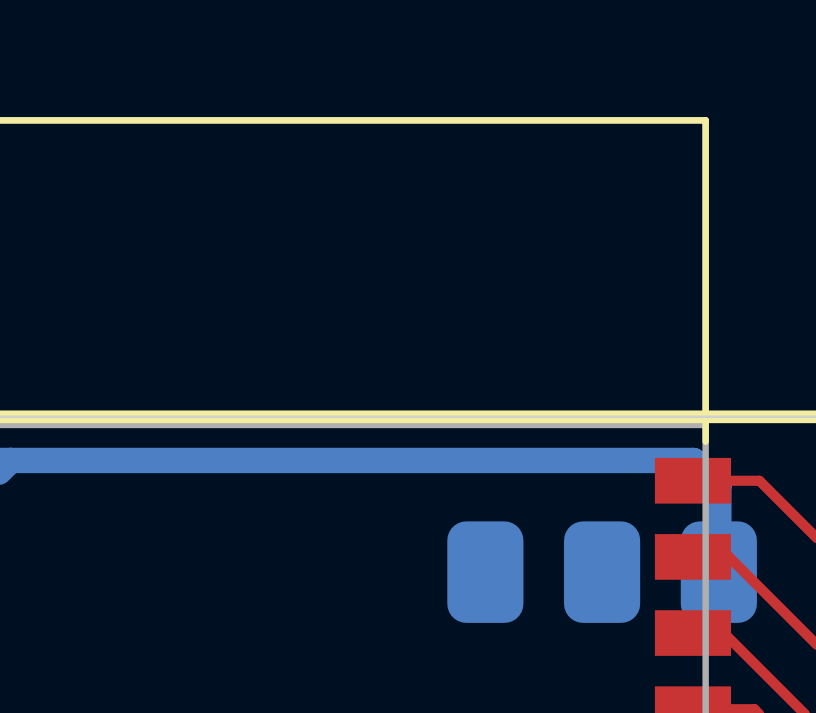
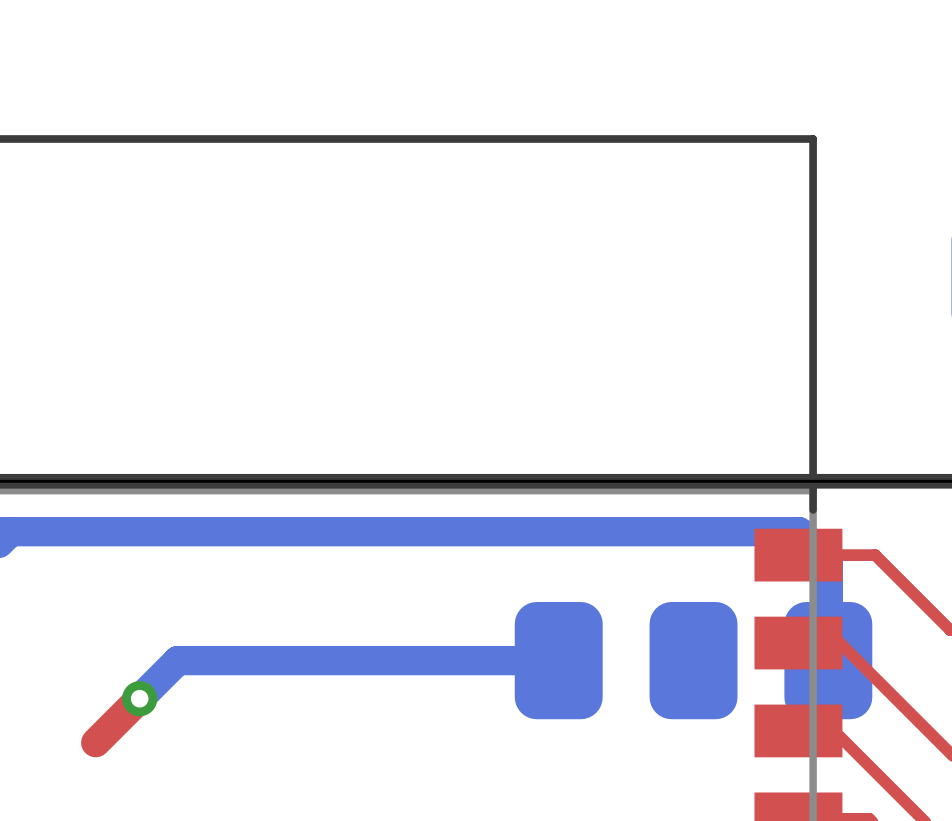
bottom track: none -> (558, 660) (177, 660) (139, 698)
top track: none -> (139, 698) (95, 742)
via: none -> (139, 698)

